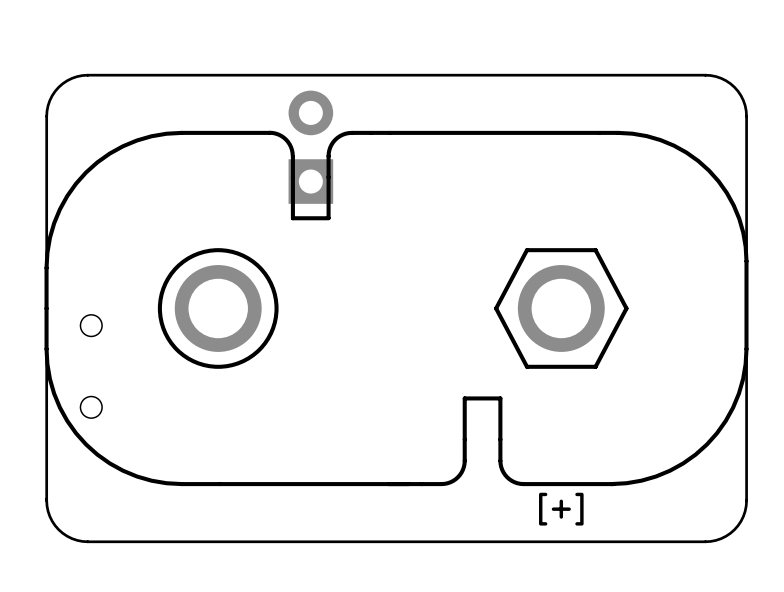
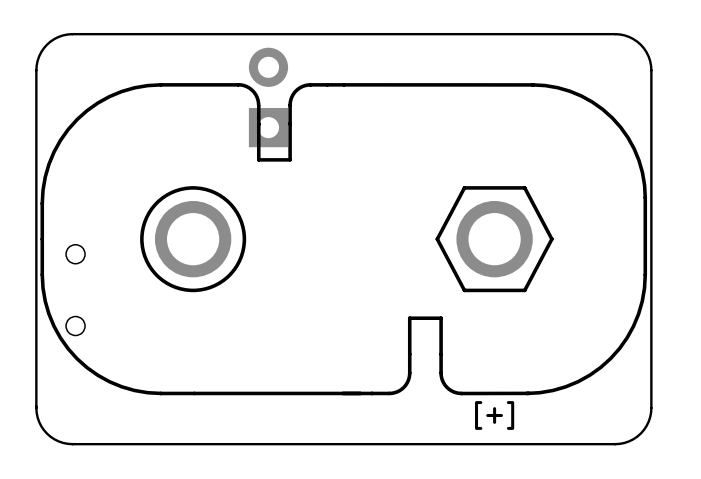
part footprint: [44, 130, 749, 487] -> [40, 82, 648, 396]

